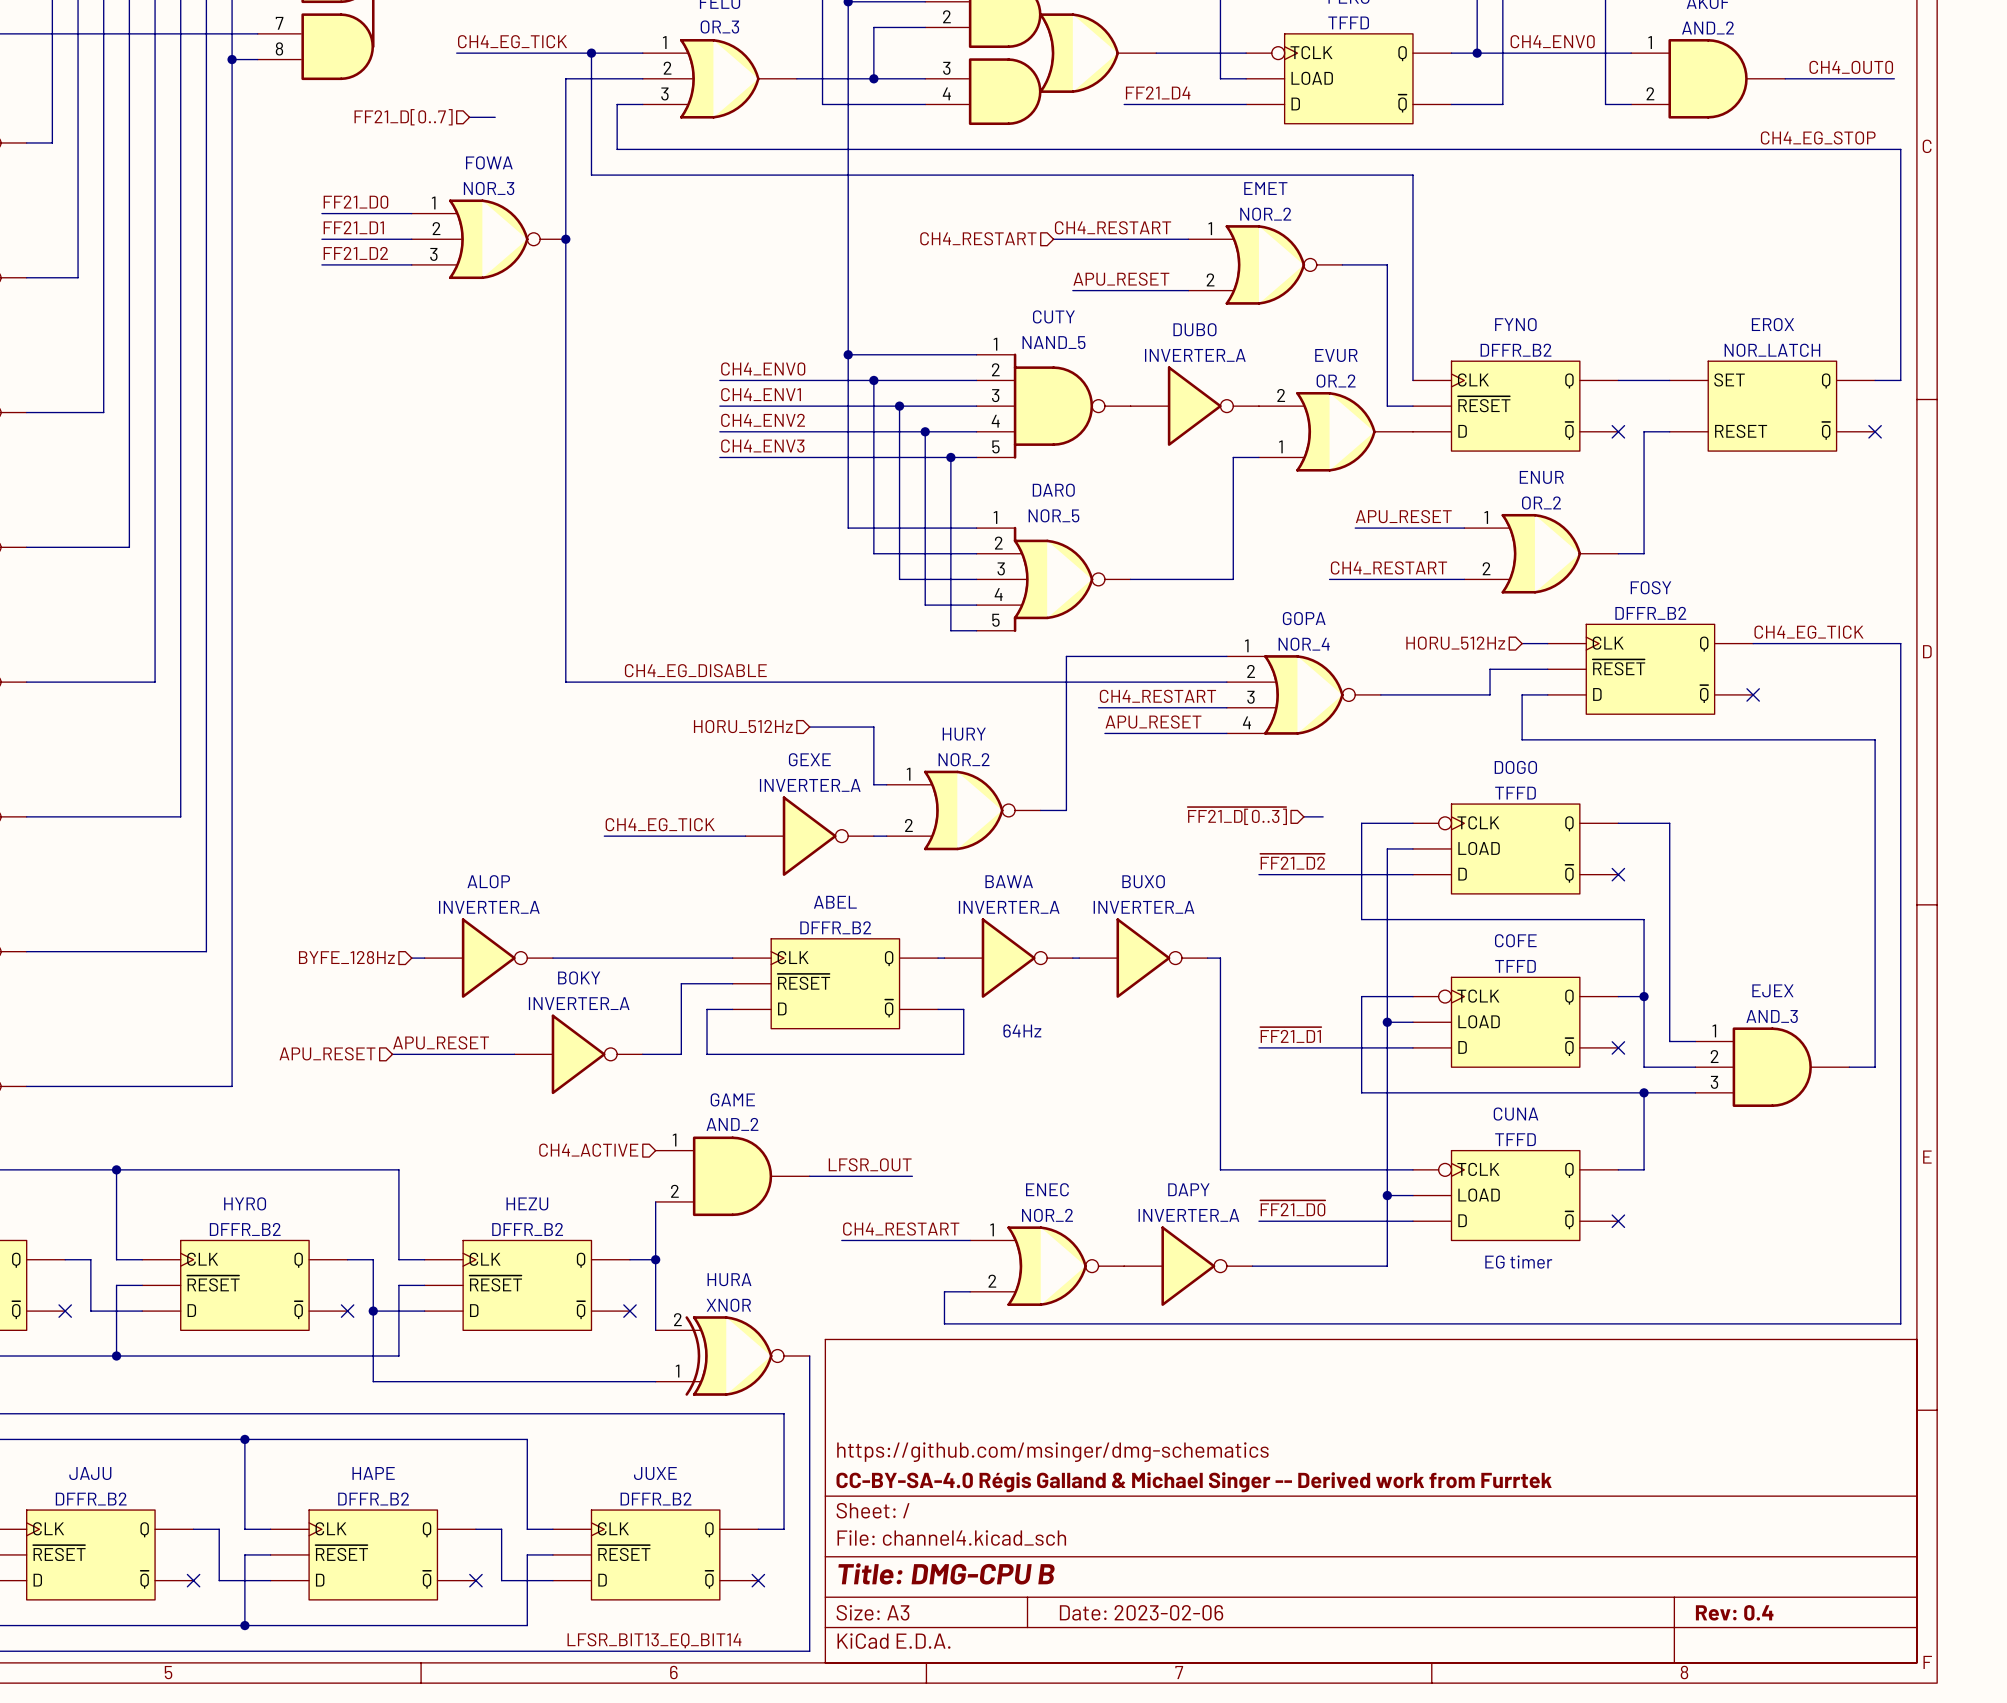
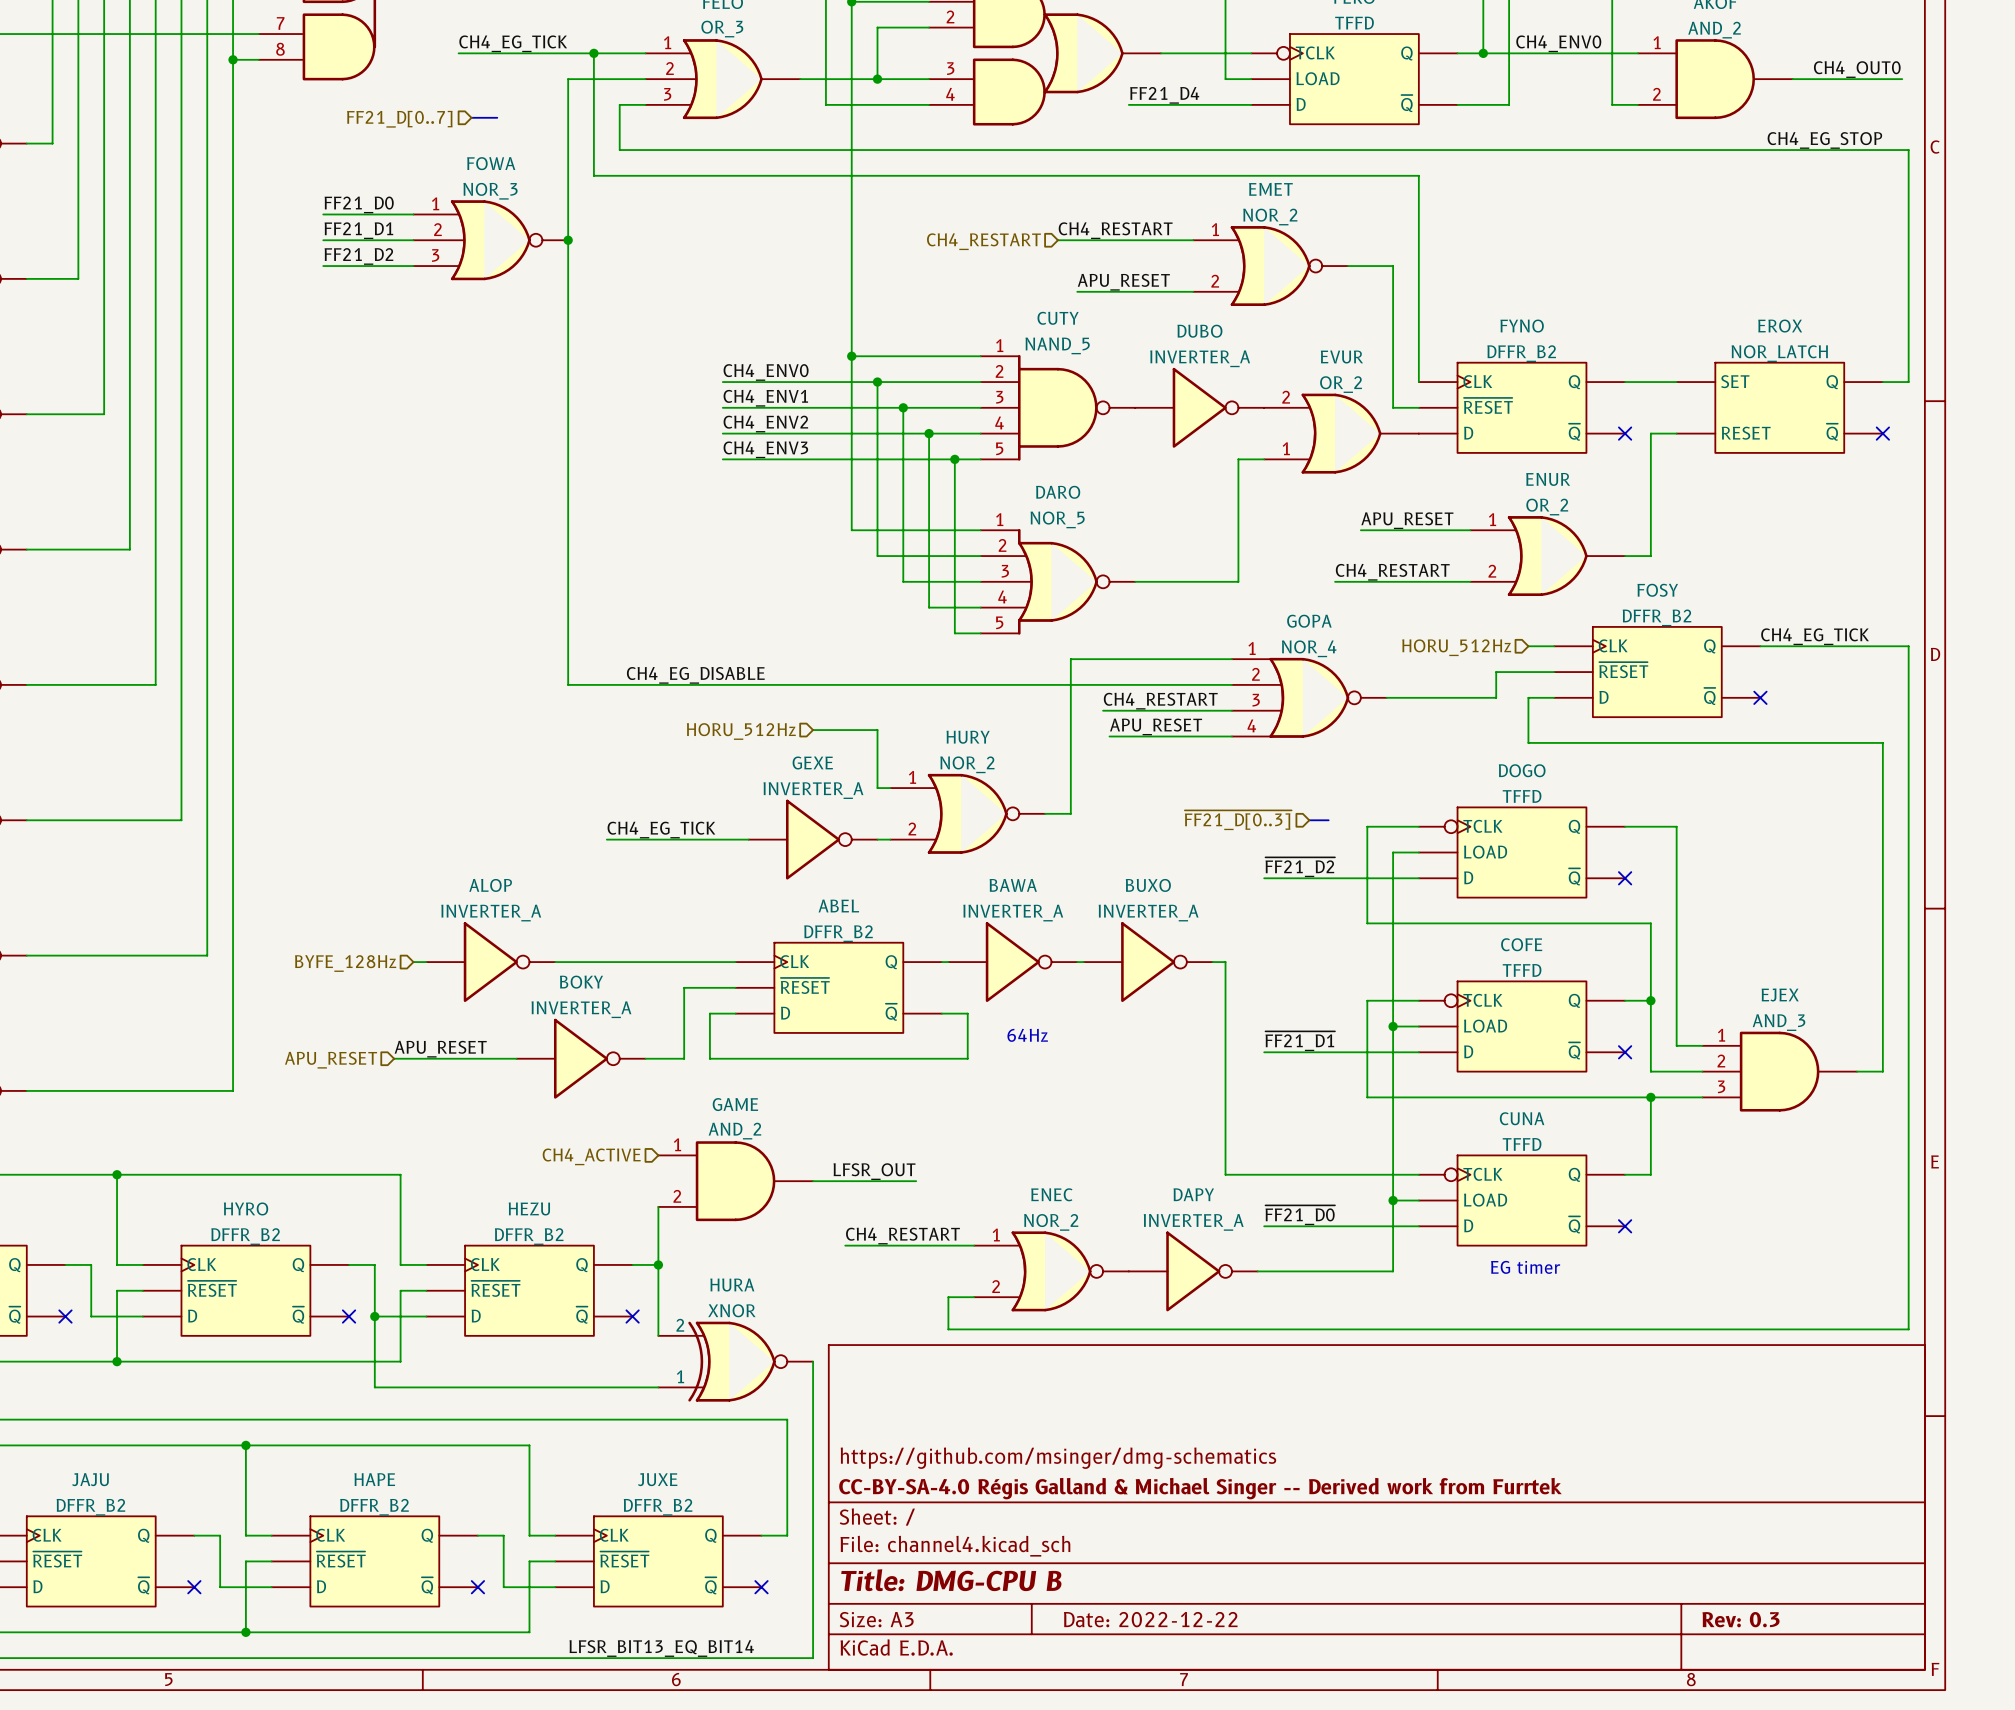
title block: Date: 2023-02-06 (1141, 1612) -> Date: 2022-12-22 (1150, 1619)
title block: Rev: 0.4 (1734, 1612) -> Rev: 0.3 (1741, 1619)

